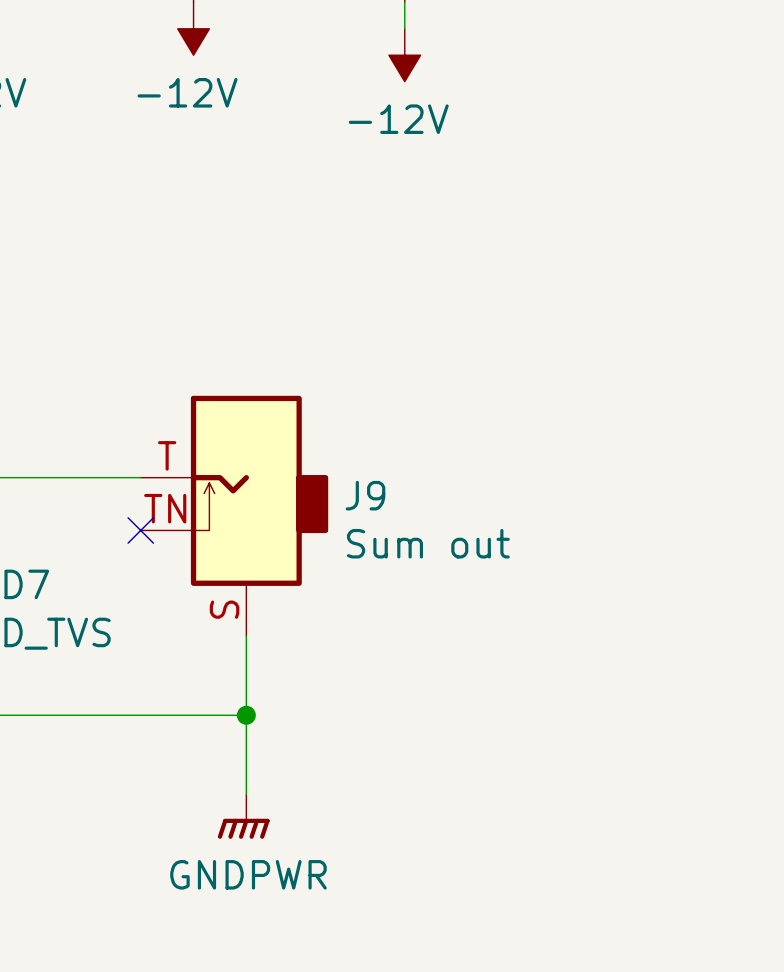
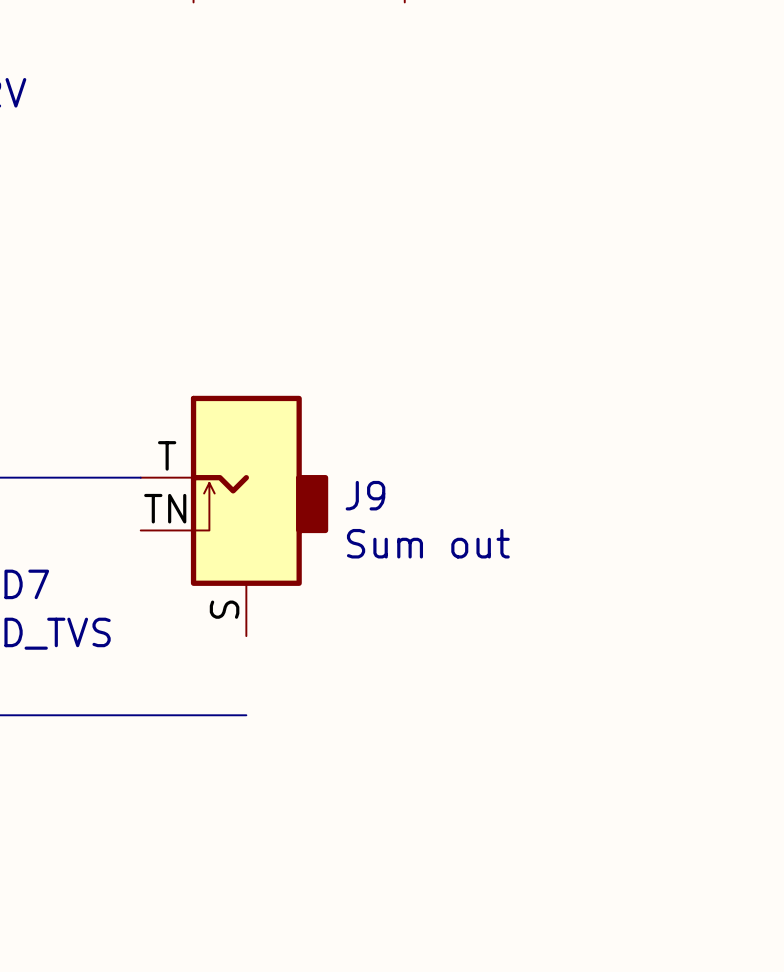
wire: (404, 2) (404, 28) -> none
power symbol: -12V (193, 28) -> none
power symbol: -12V (404, 55) -> none
no-connect mark: (140, 530) -> none
wire: (246, 636) (246, 794) -> none
junction: (246, 715) -> none
power symbol: GNDPWR (243, 816) -> none

